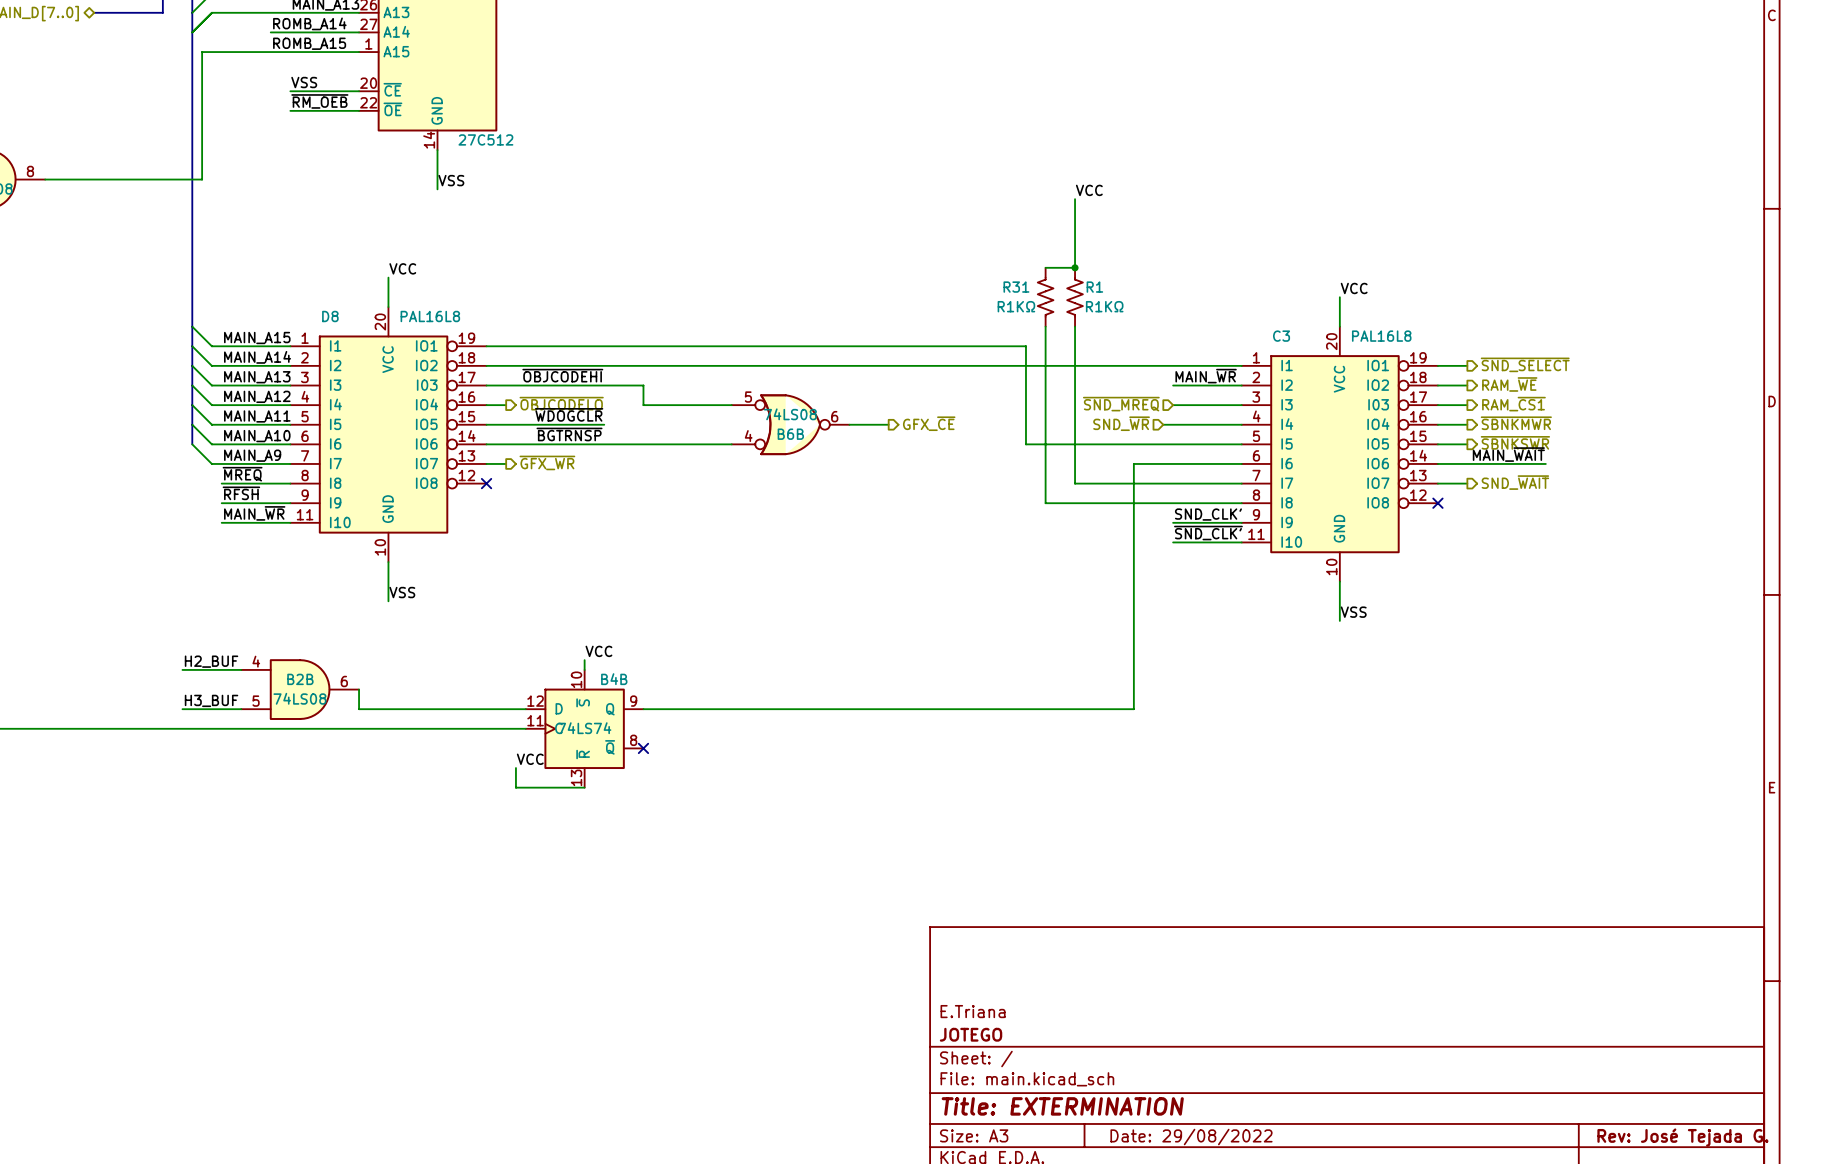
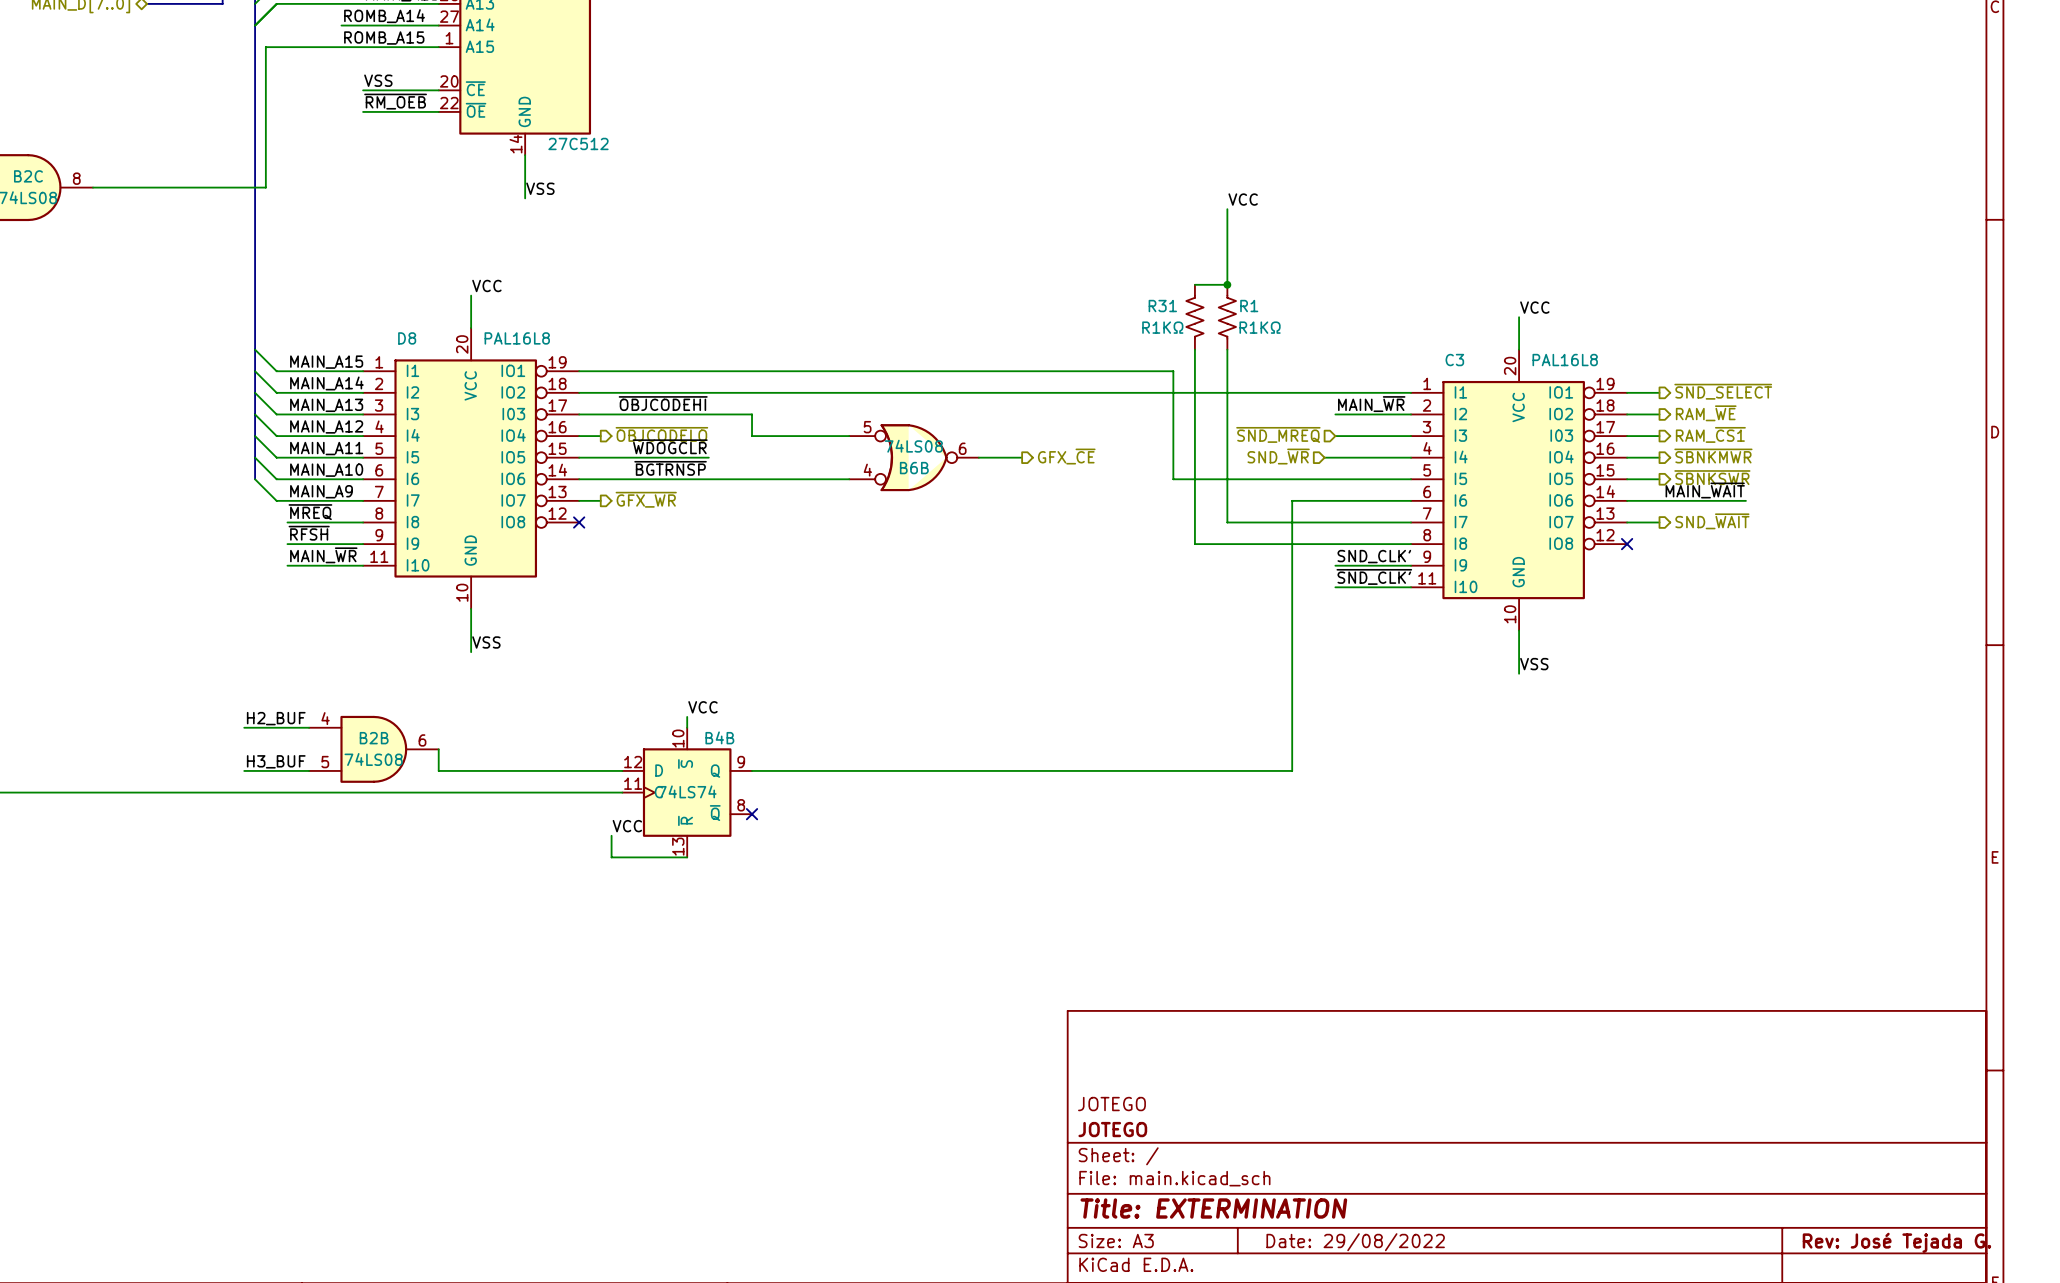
title block: E.Triana (973, 1011) -> JOTEGO (1111, 1104)

